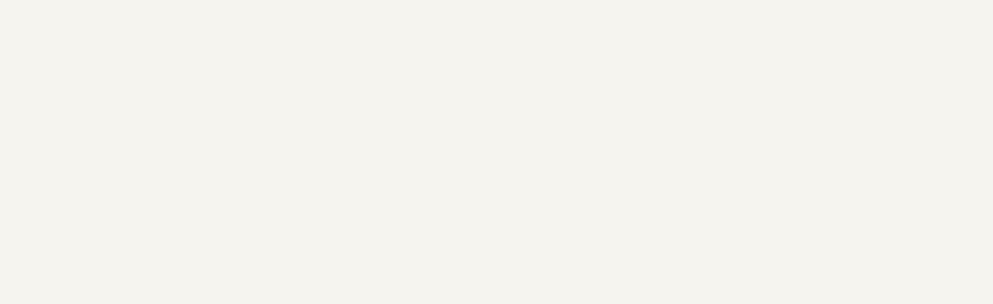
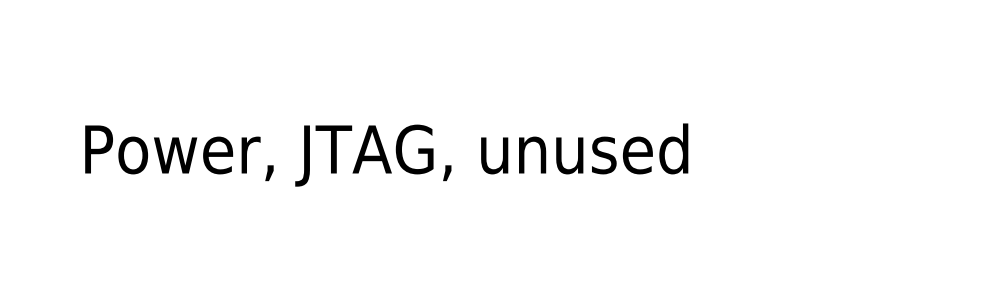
text: none -> Power, JTAG, unused (386, 155)

